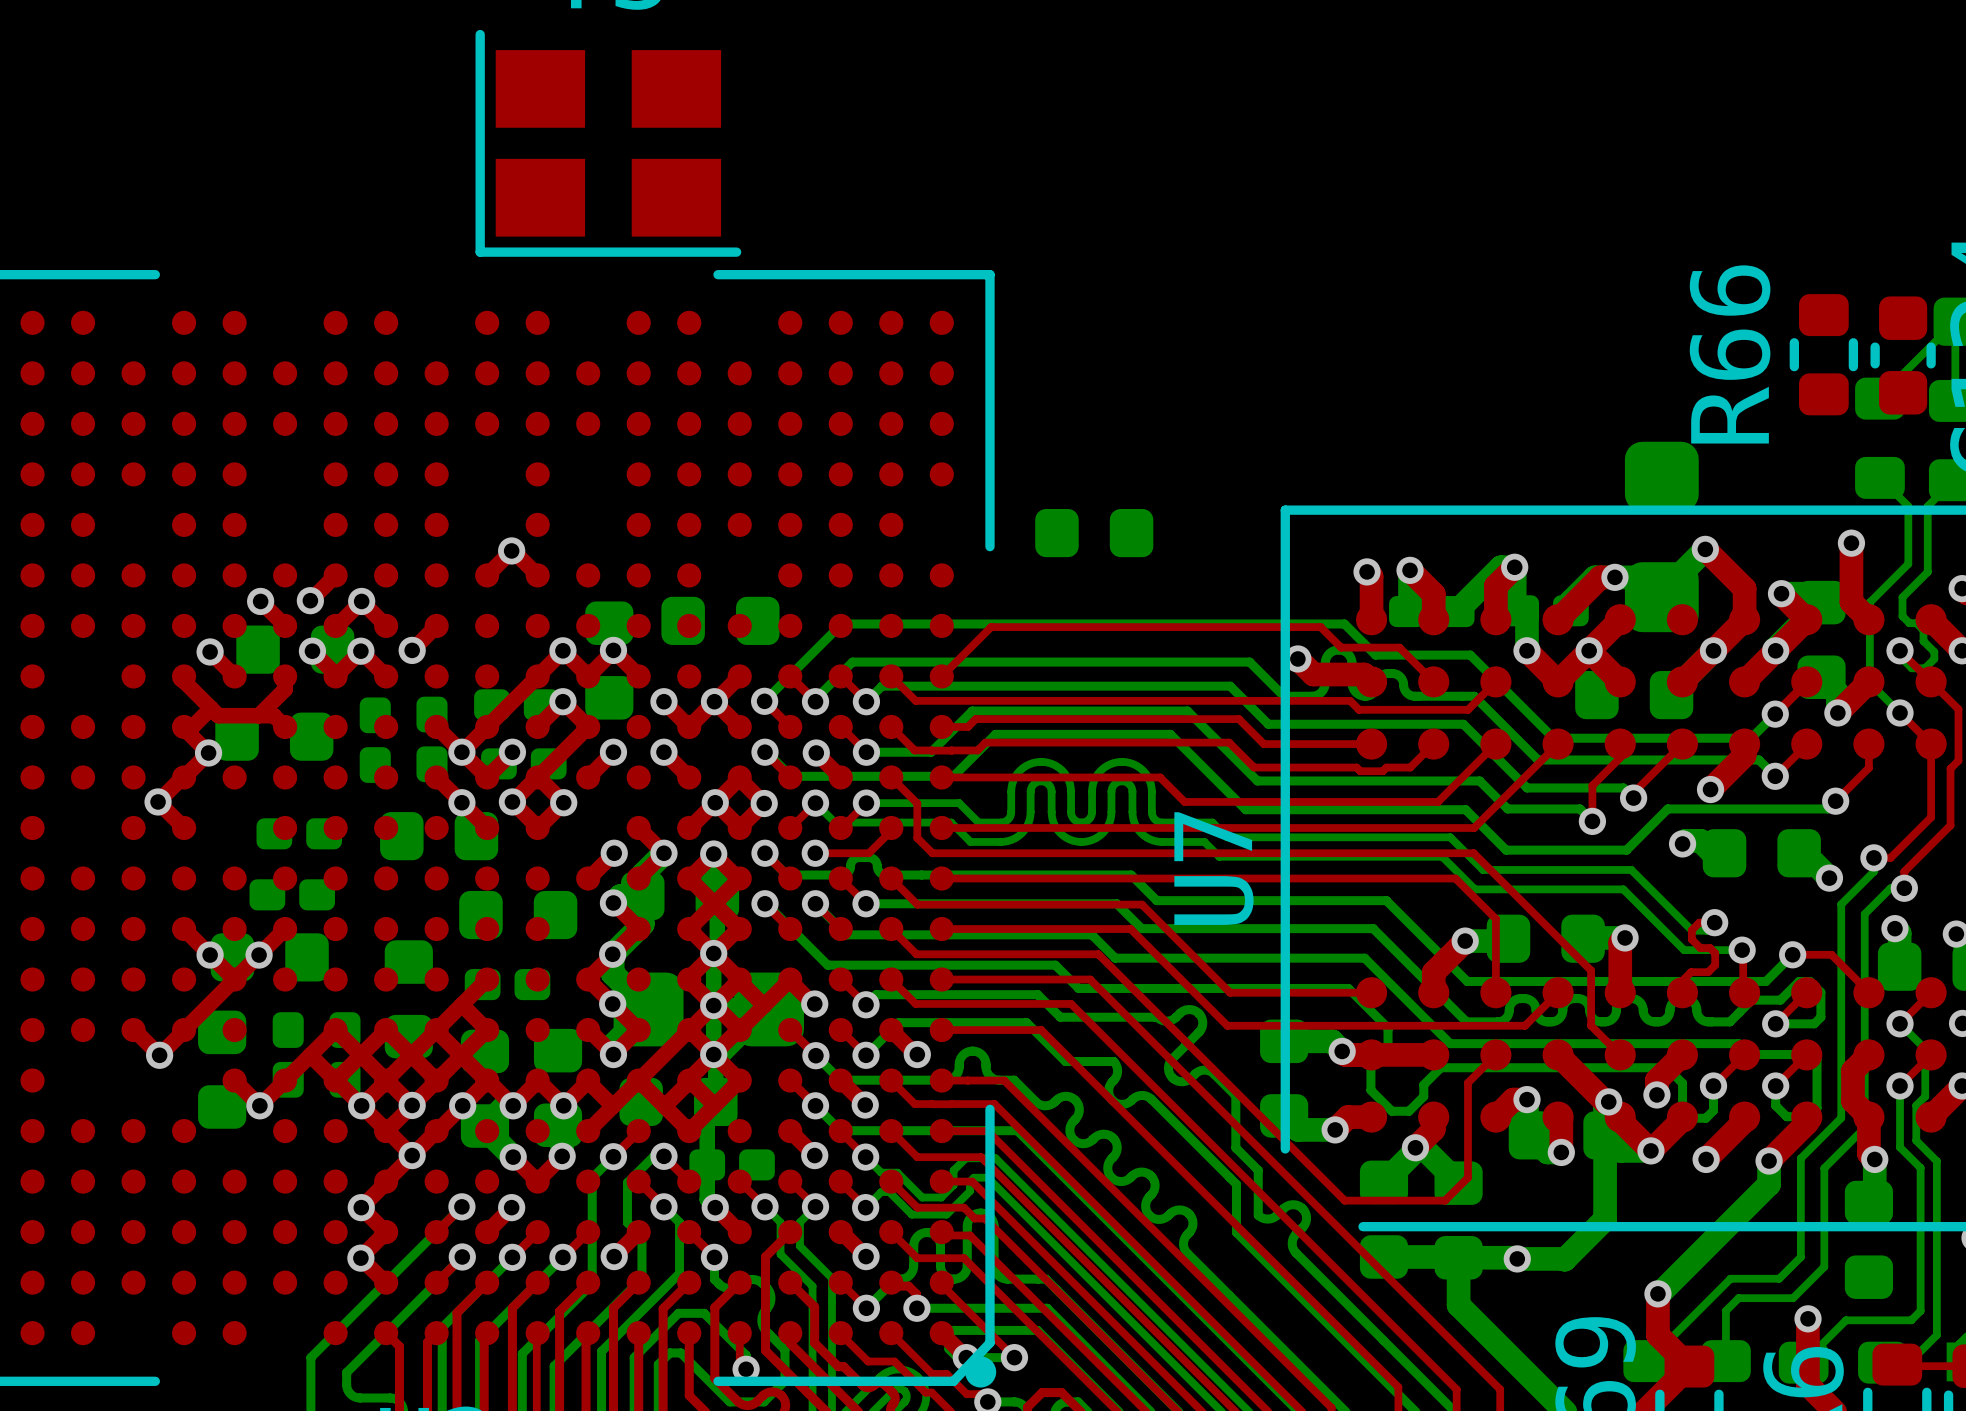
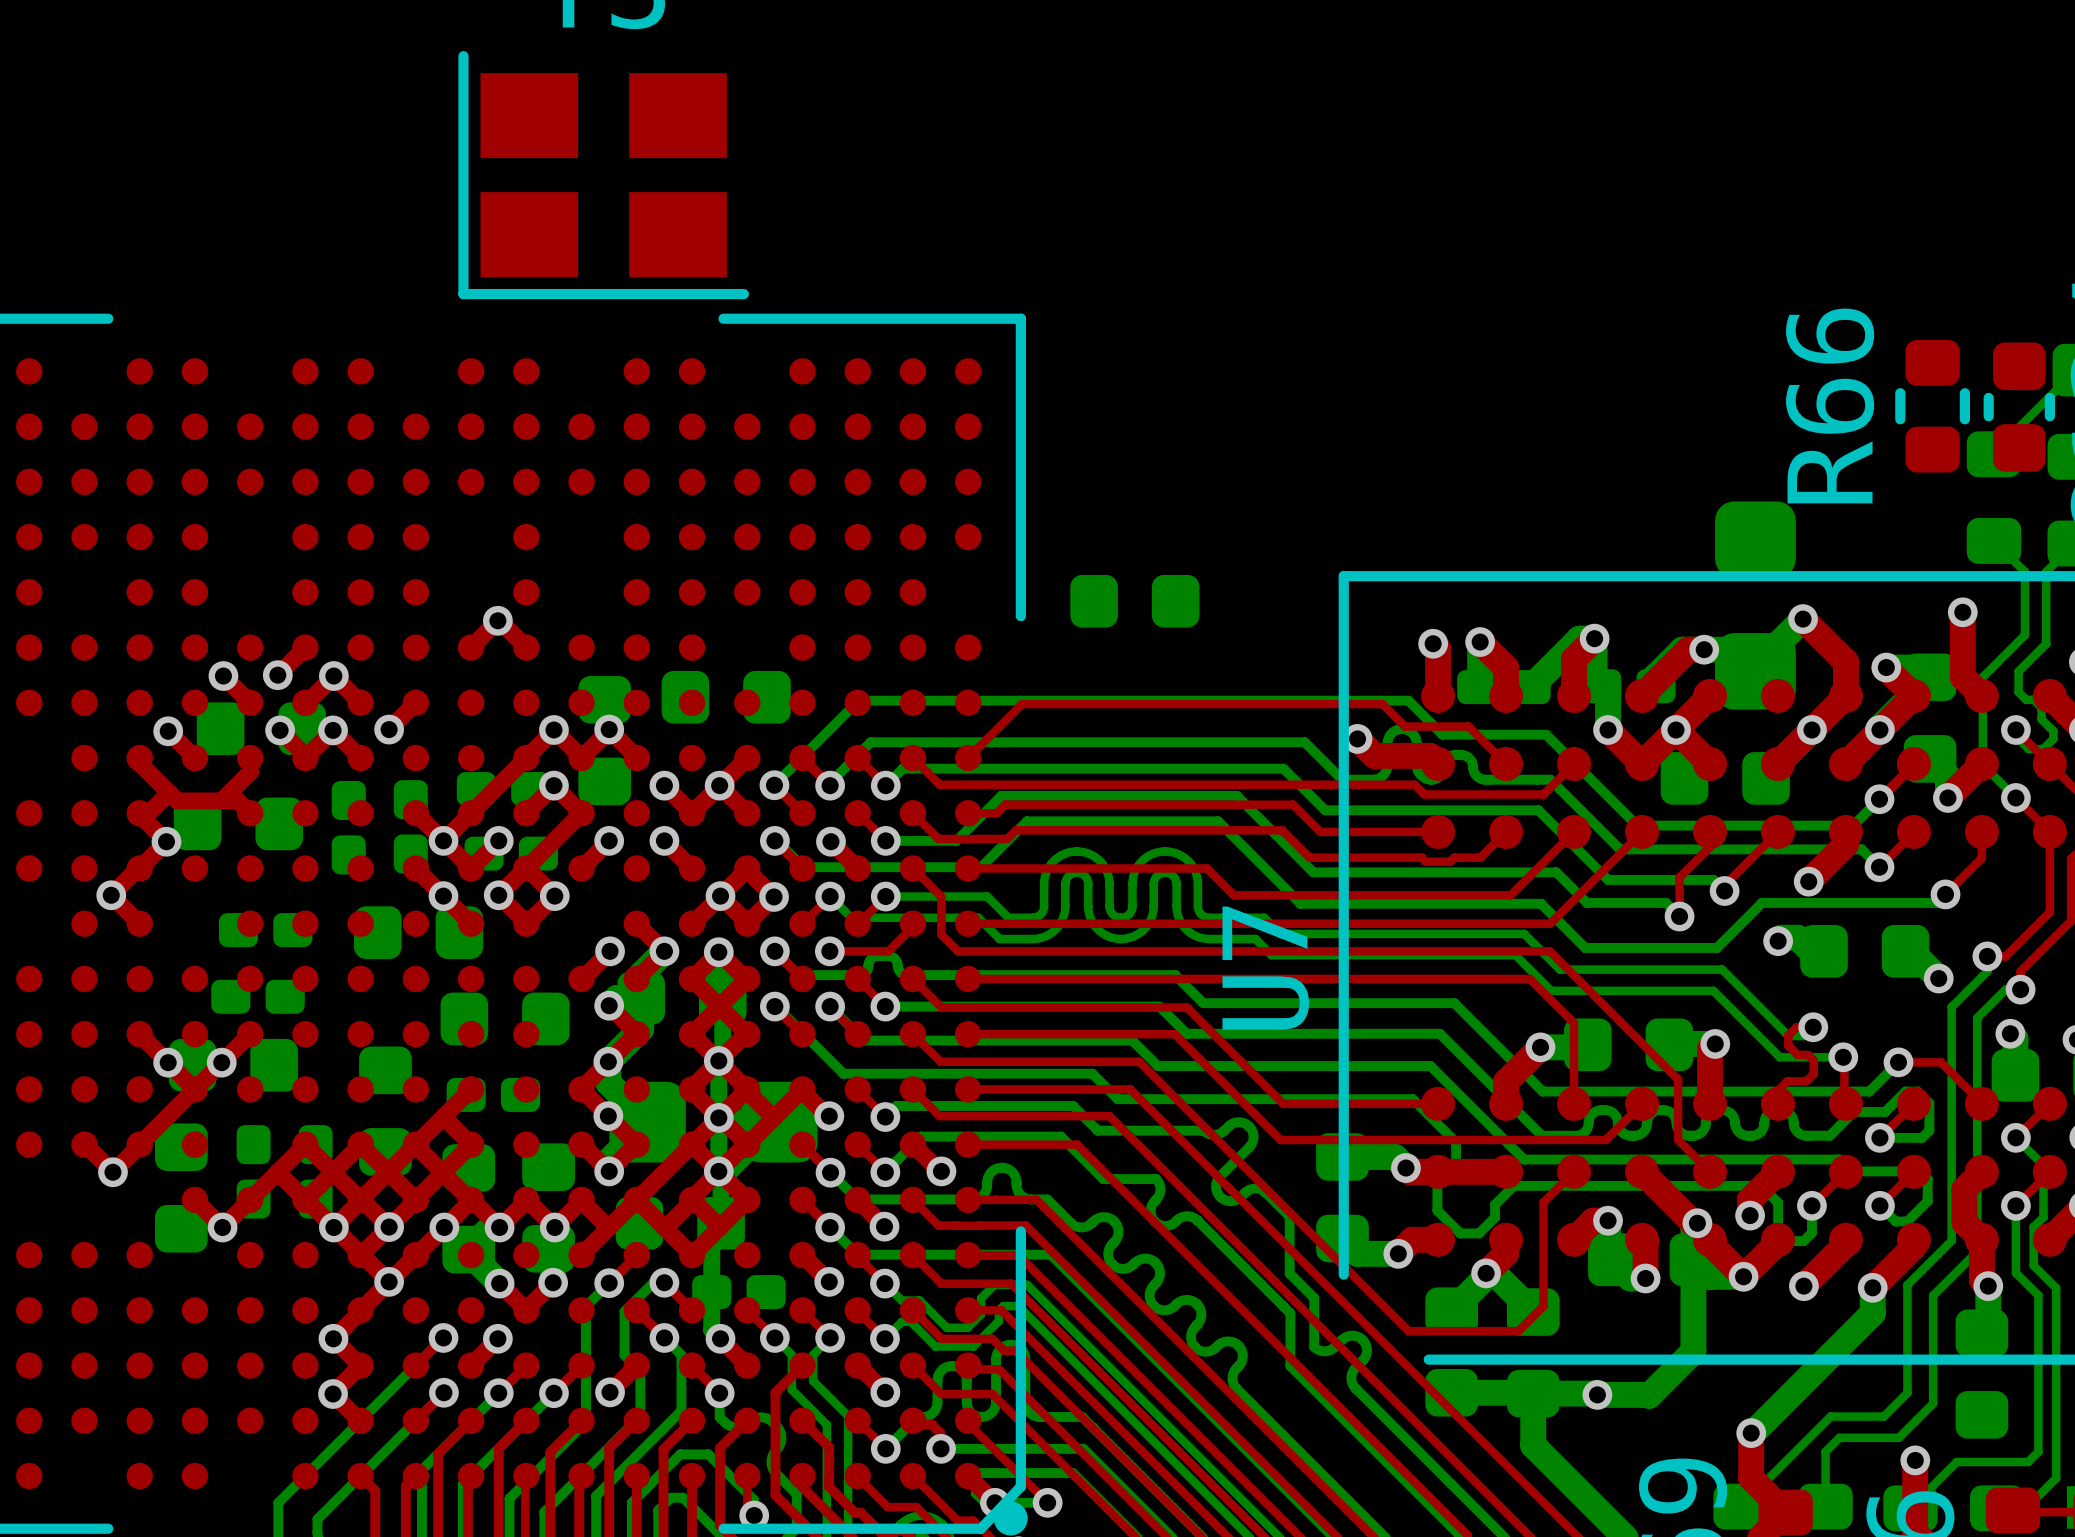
bottom track: (1817, 1059) (1817, 1108) (1808, 1116) (1786, 1116) (1775, 1105) (1775, 1086) -> (1925, 1176) (1927, 1179) (1927, 1201) (1907, 1221) (1895, 1221) (1879, 1205)

